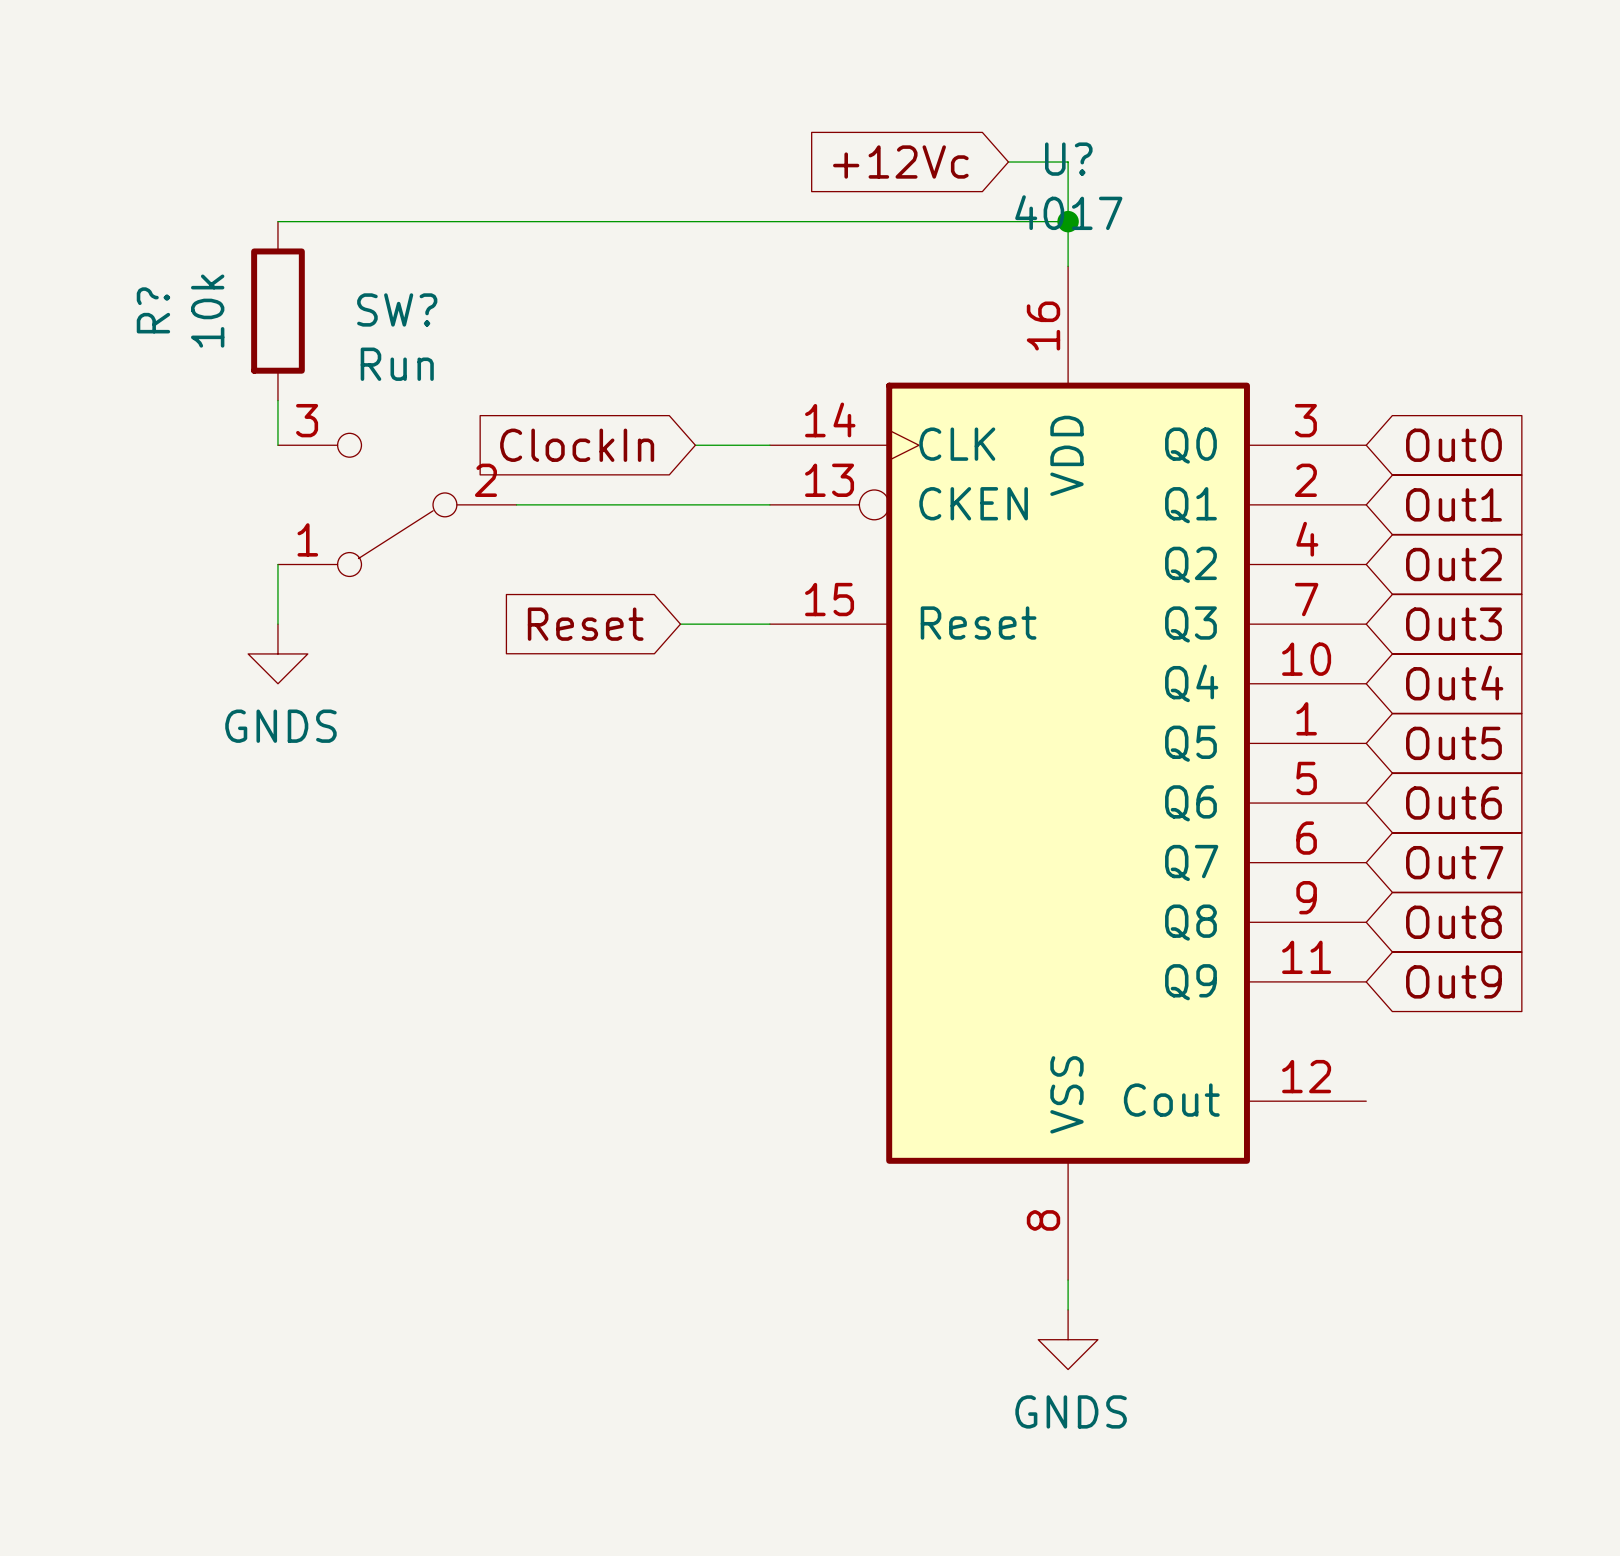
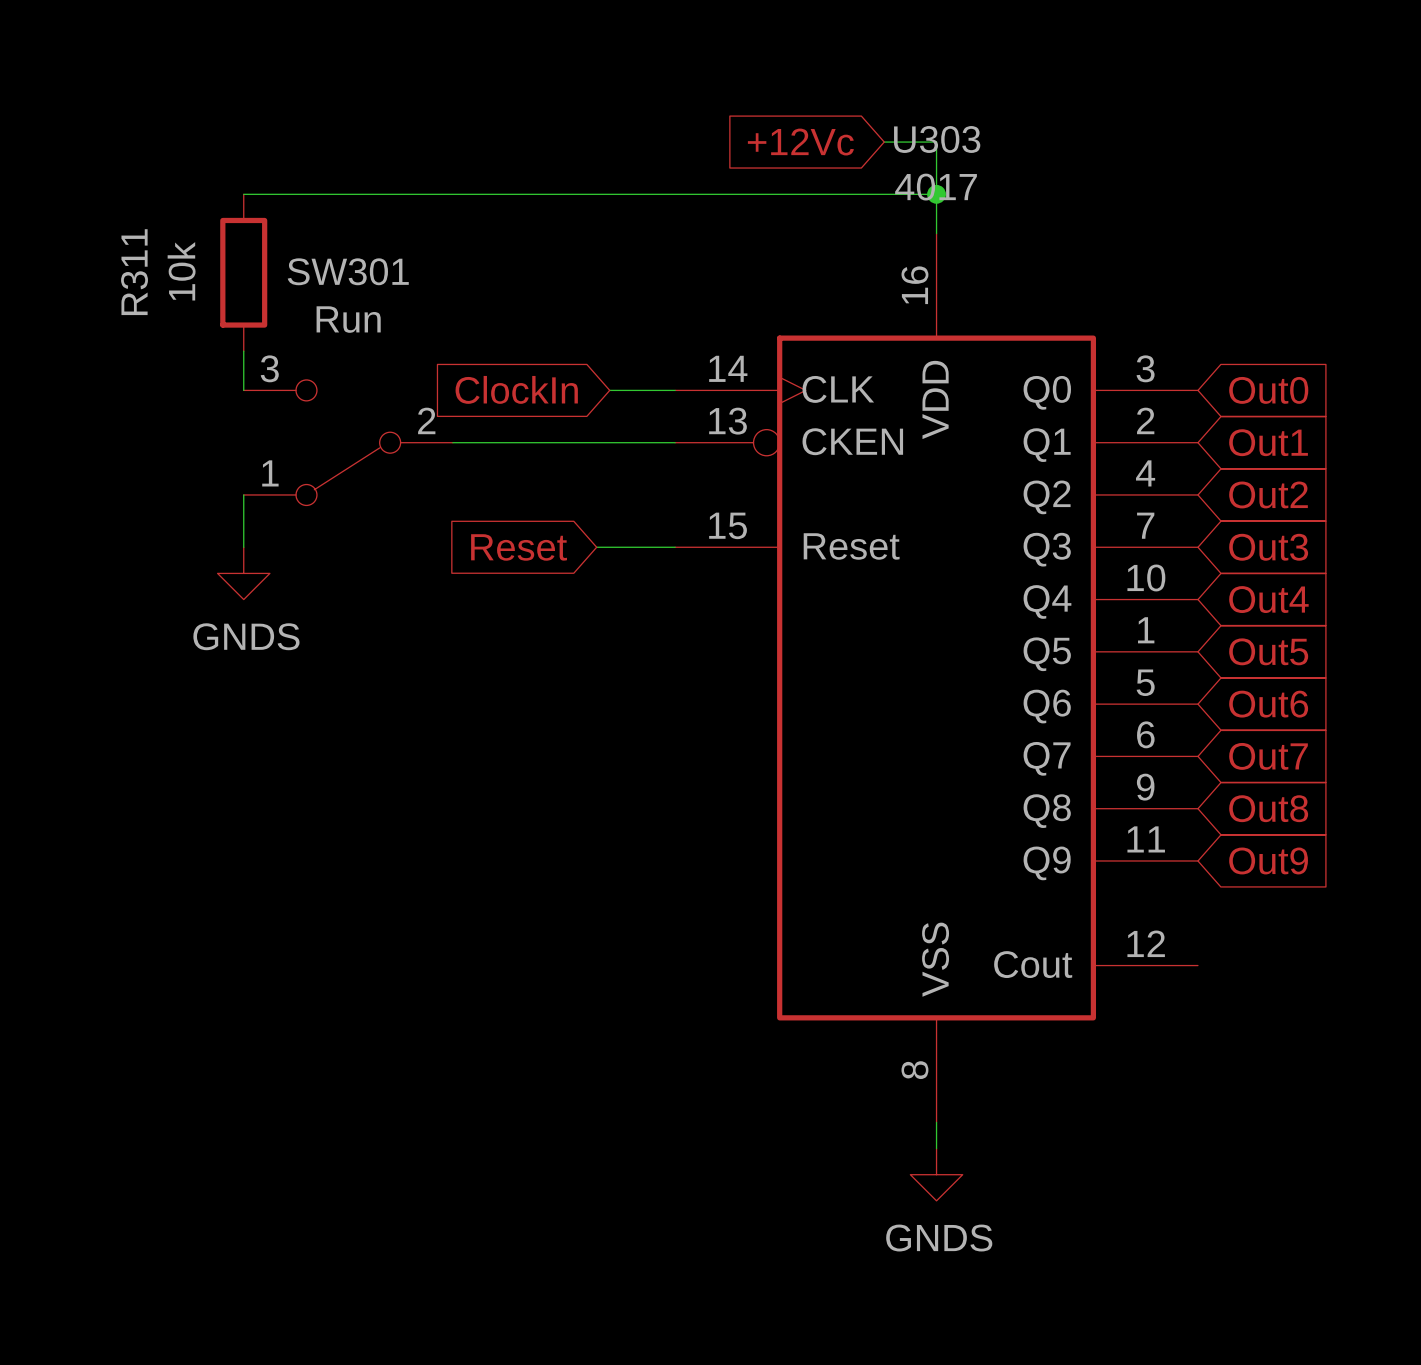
U? name: U? (1068, 159) -> U303 (937, 139)
SW? name: SW? (397, 309) -> SW301 (348, 271)
R? name: R? (153, 310) -> R311 (134, 272)

